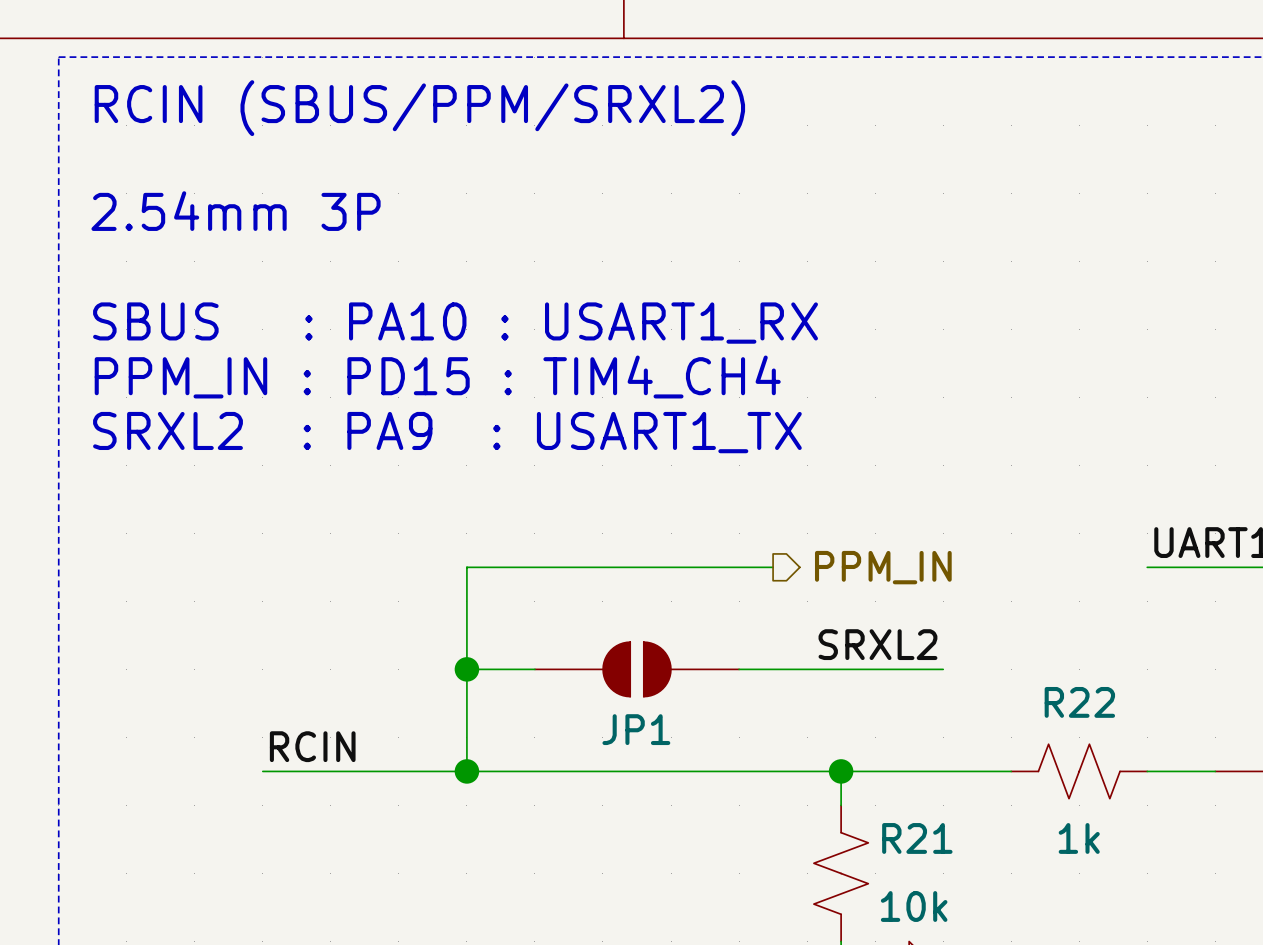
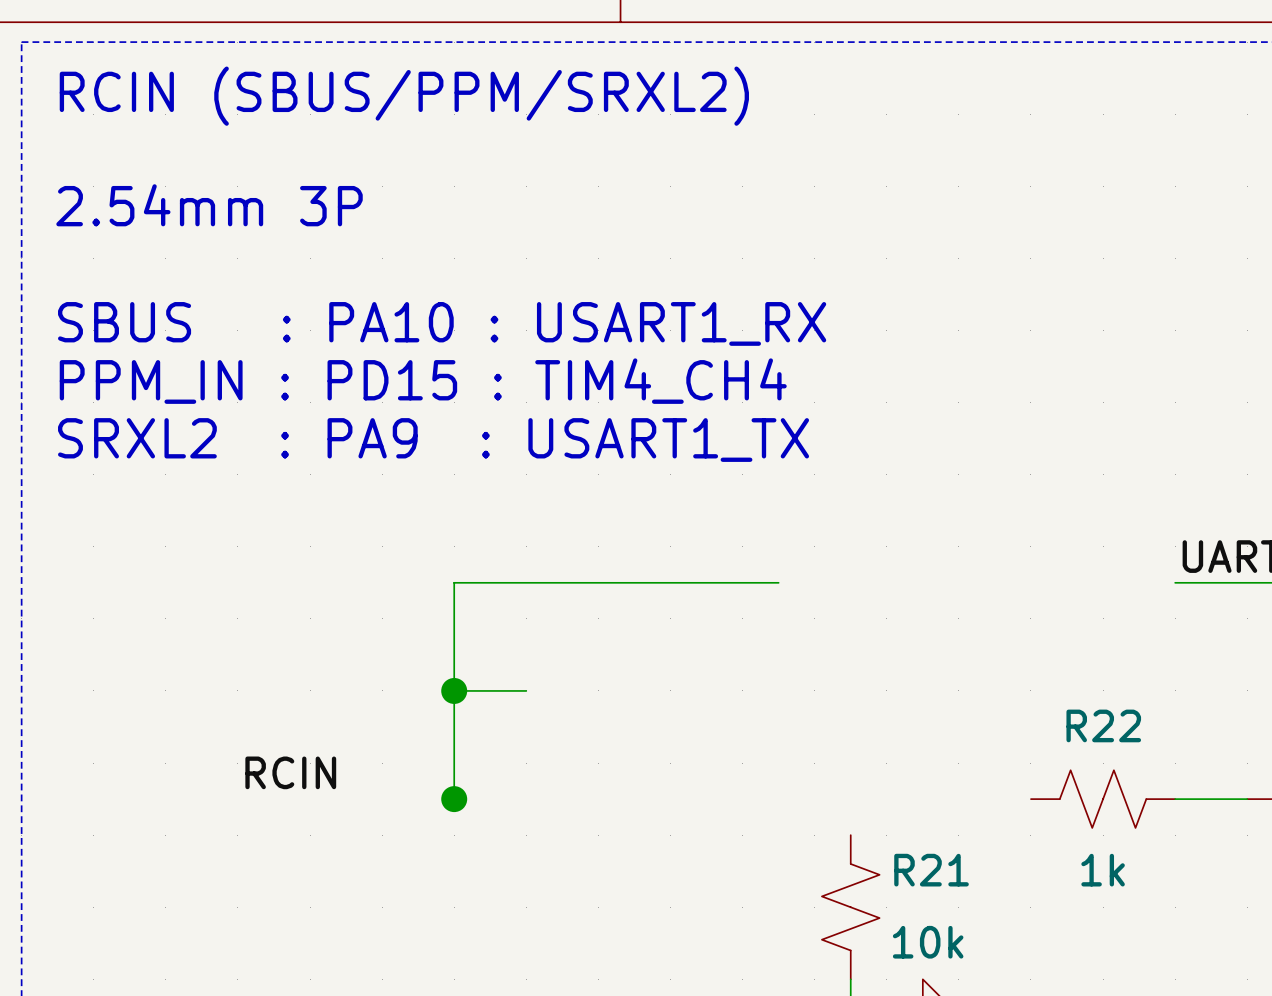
hierarchical label: PPM_IN (883, 567) -> none
label: SRXL2 (877, 644) -> none
JP1: (637, 669) -> none
wire: (739, 669) (943, 669) -> none
wire: (262, 771) (1011, 771) -> none
wire: (841, 771) (841, 805) -> none
junction: (841, 771) -> none

